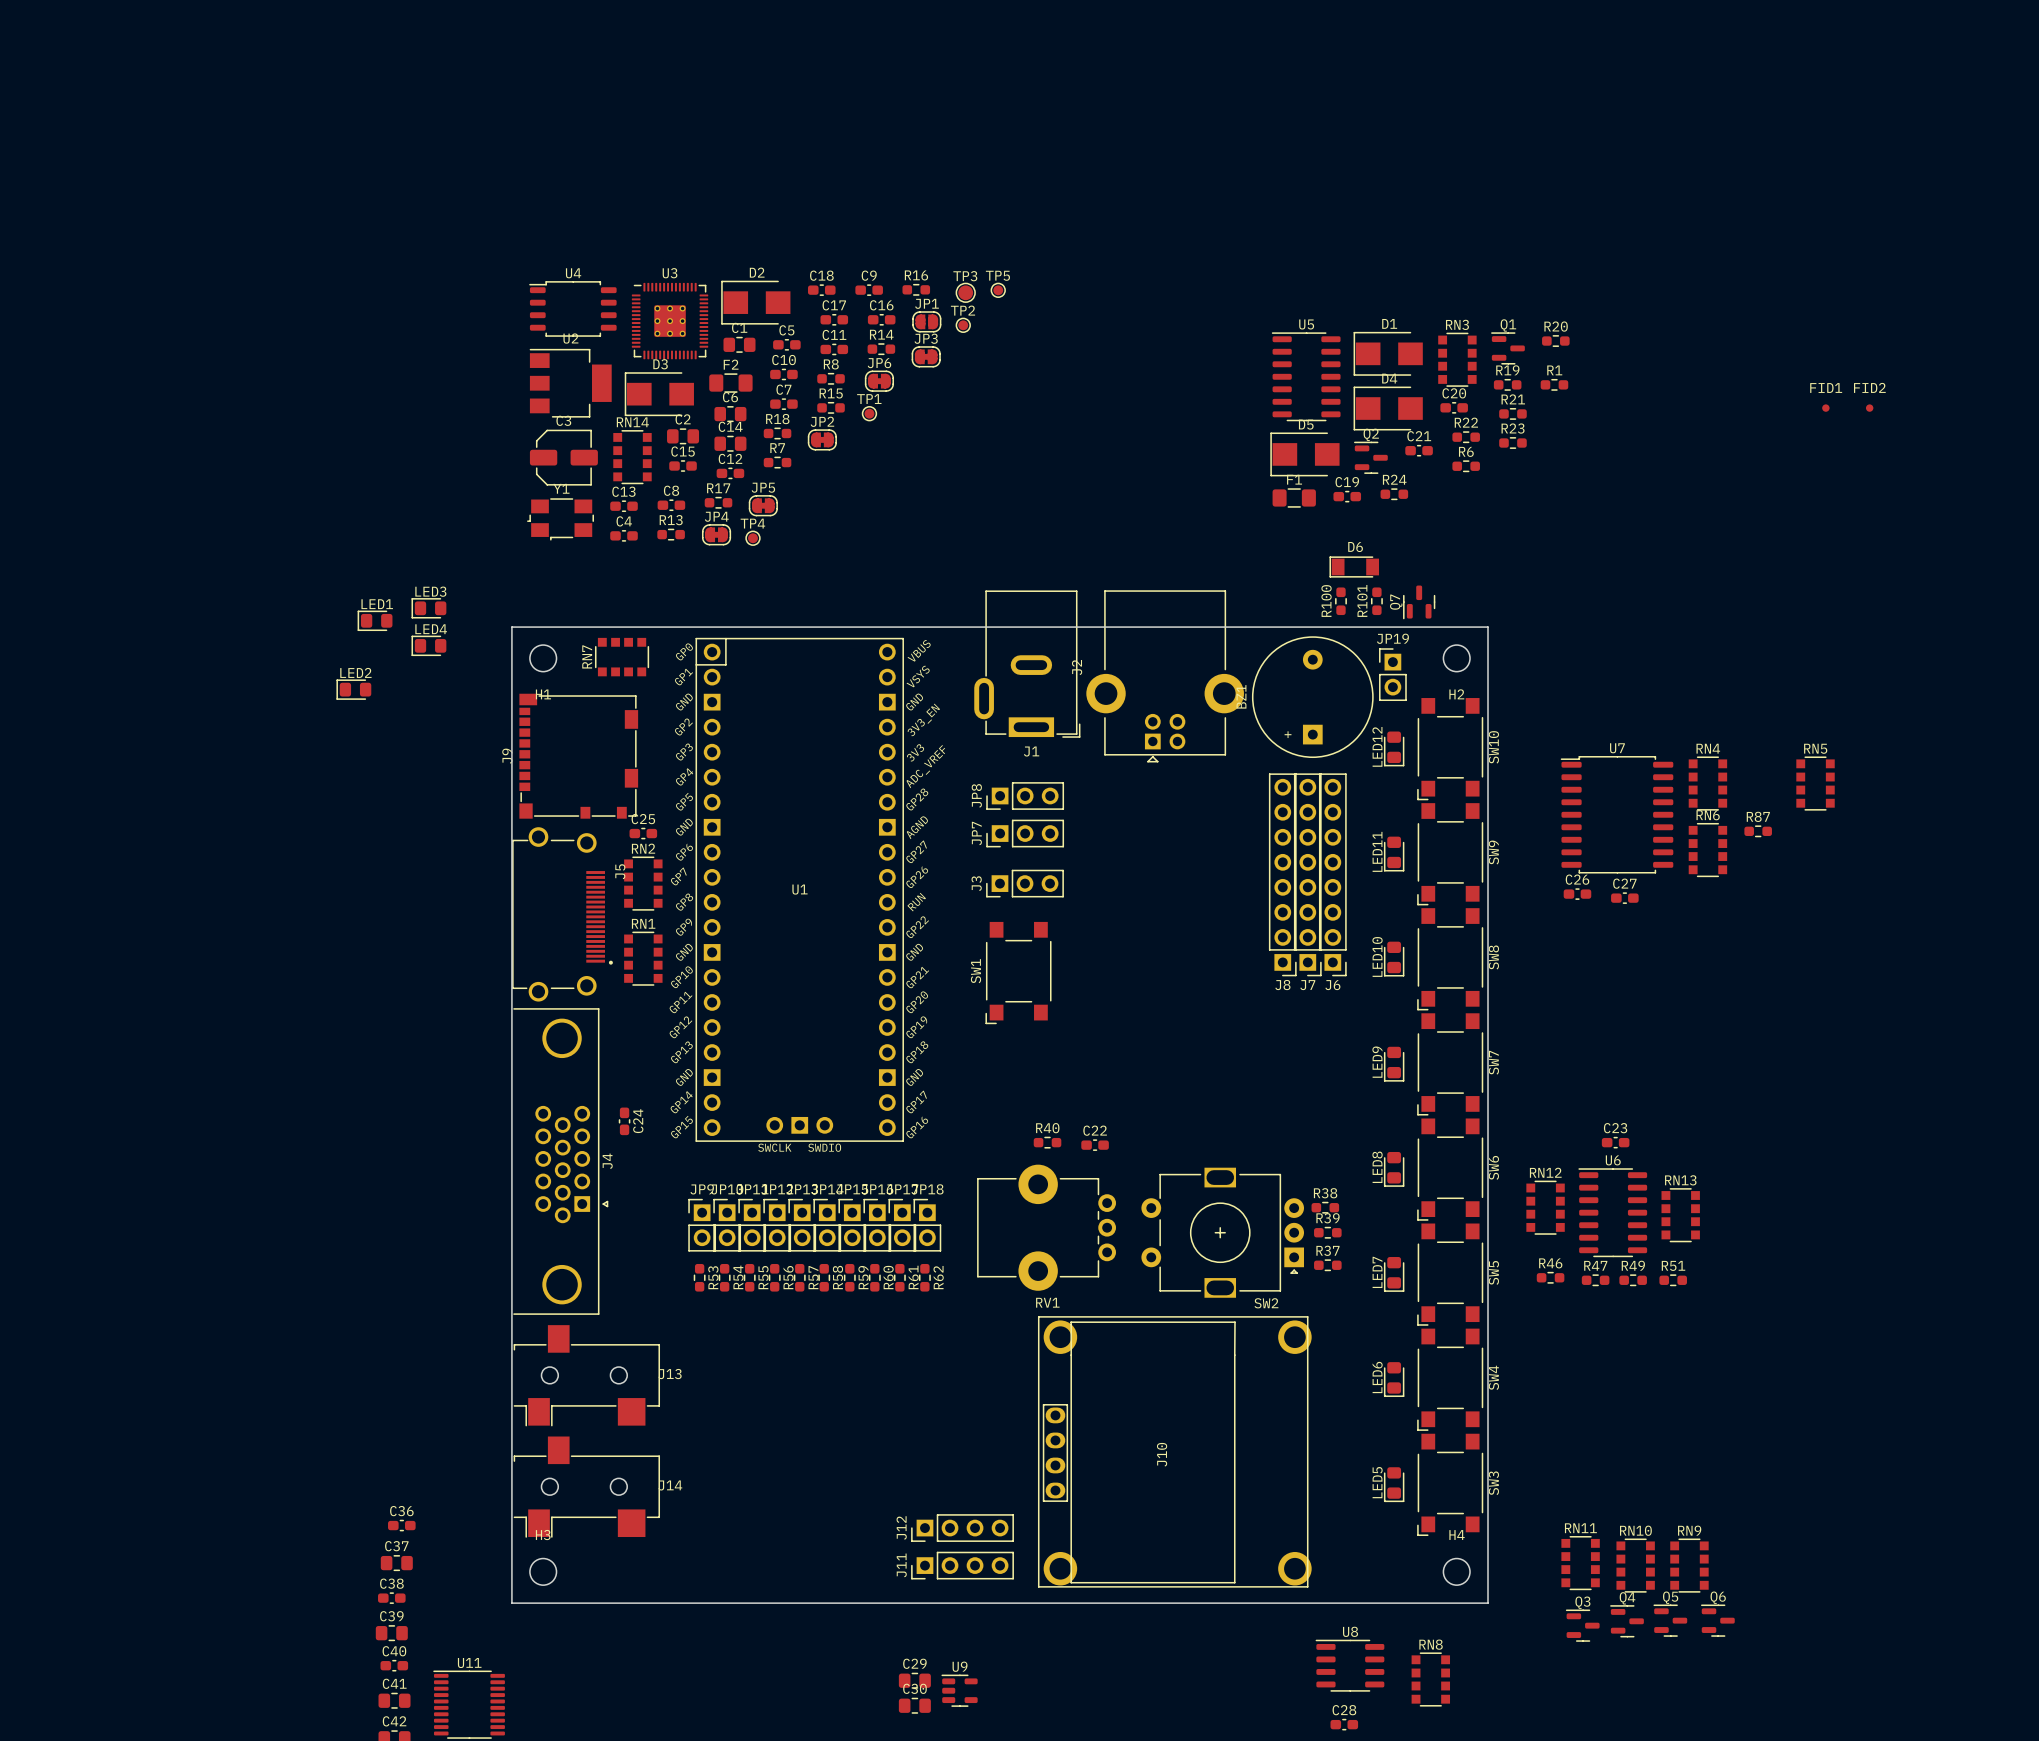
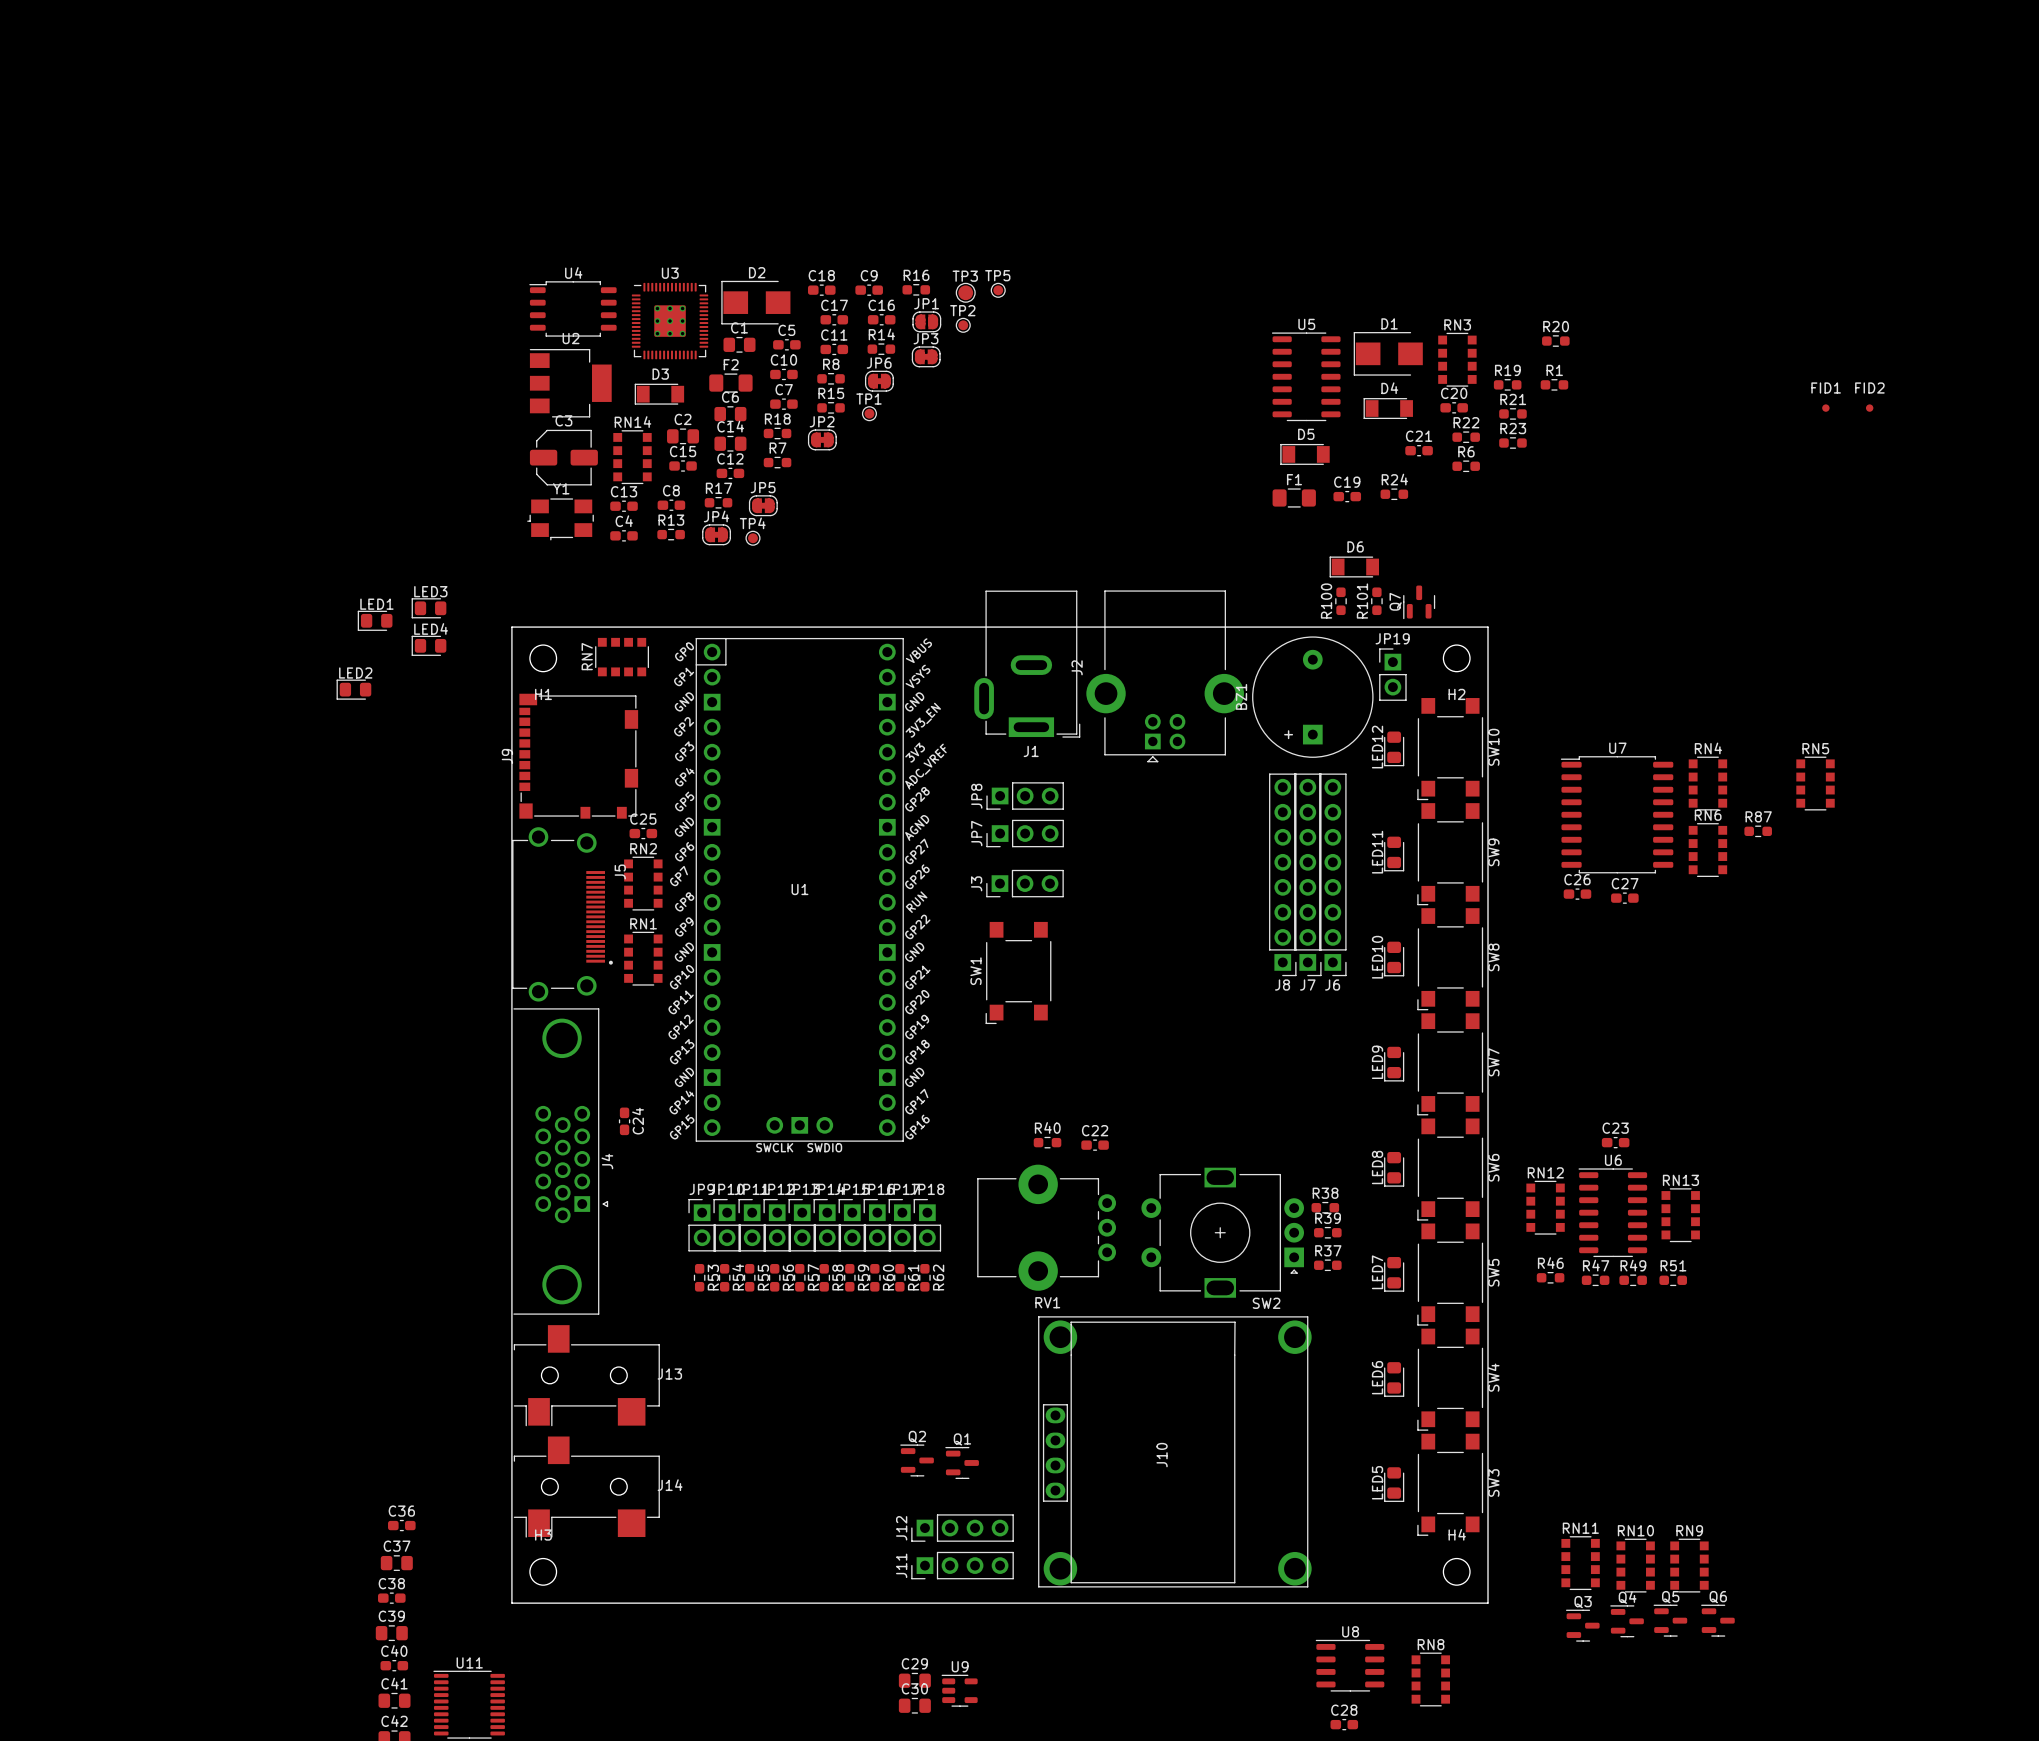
Q1 position: (1508, 348) -> (962, 1462)
D3 footprint: [624, 372, 694, 416] -> [634, 383, 685, 405]
D4 footprint: [1353, 386, 1423, 431] -> [1363, 398, 1413, 419]
D5 footprint: [1270, 432, 1340, 477] -> [1280, 443, 1330, 465]
Q2 position: (1370, 457) -> (917, 1460)

